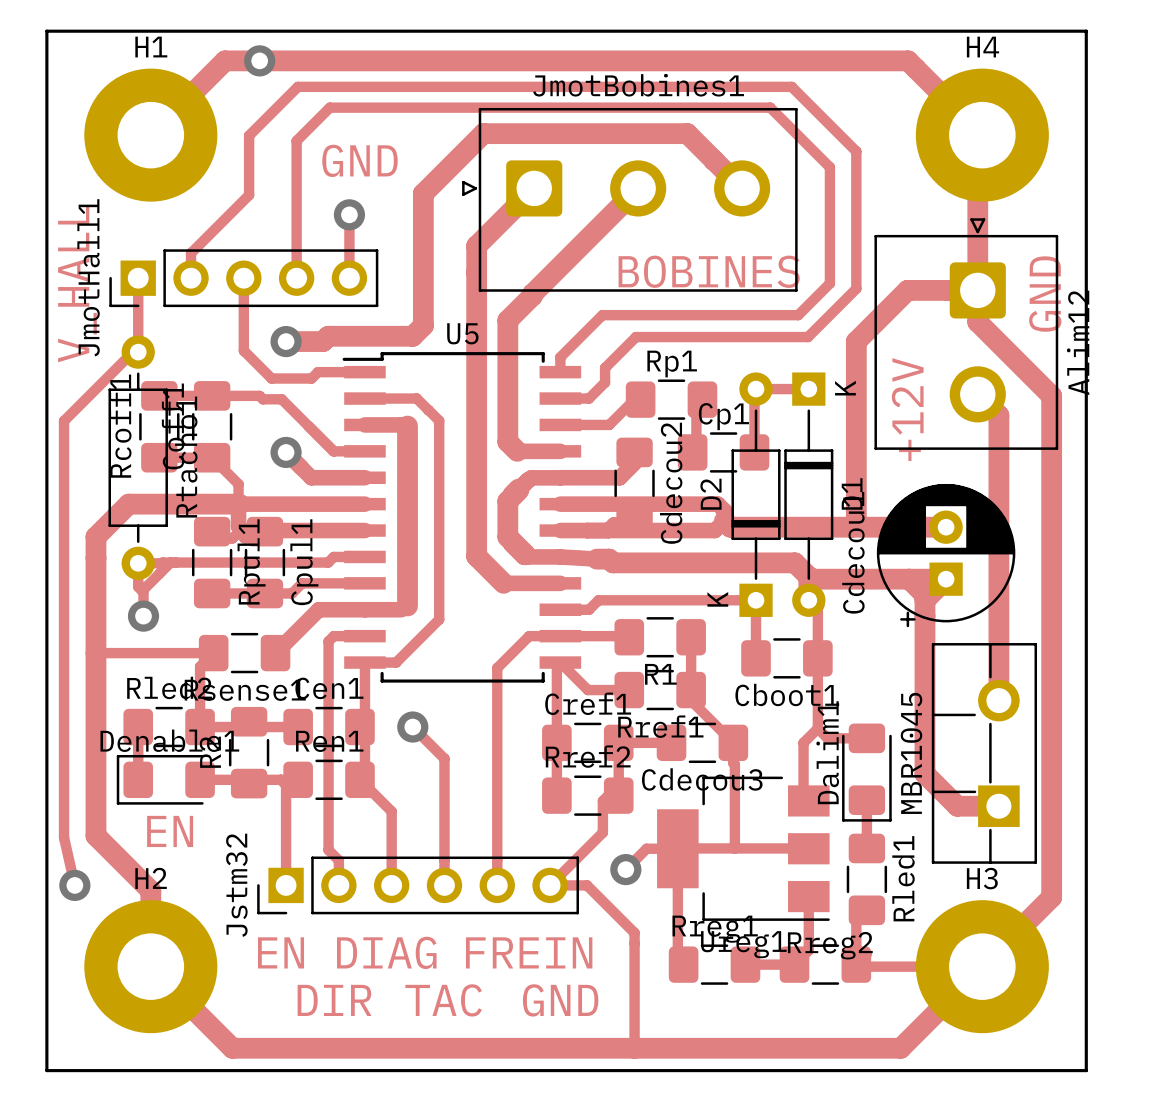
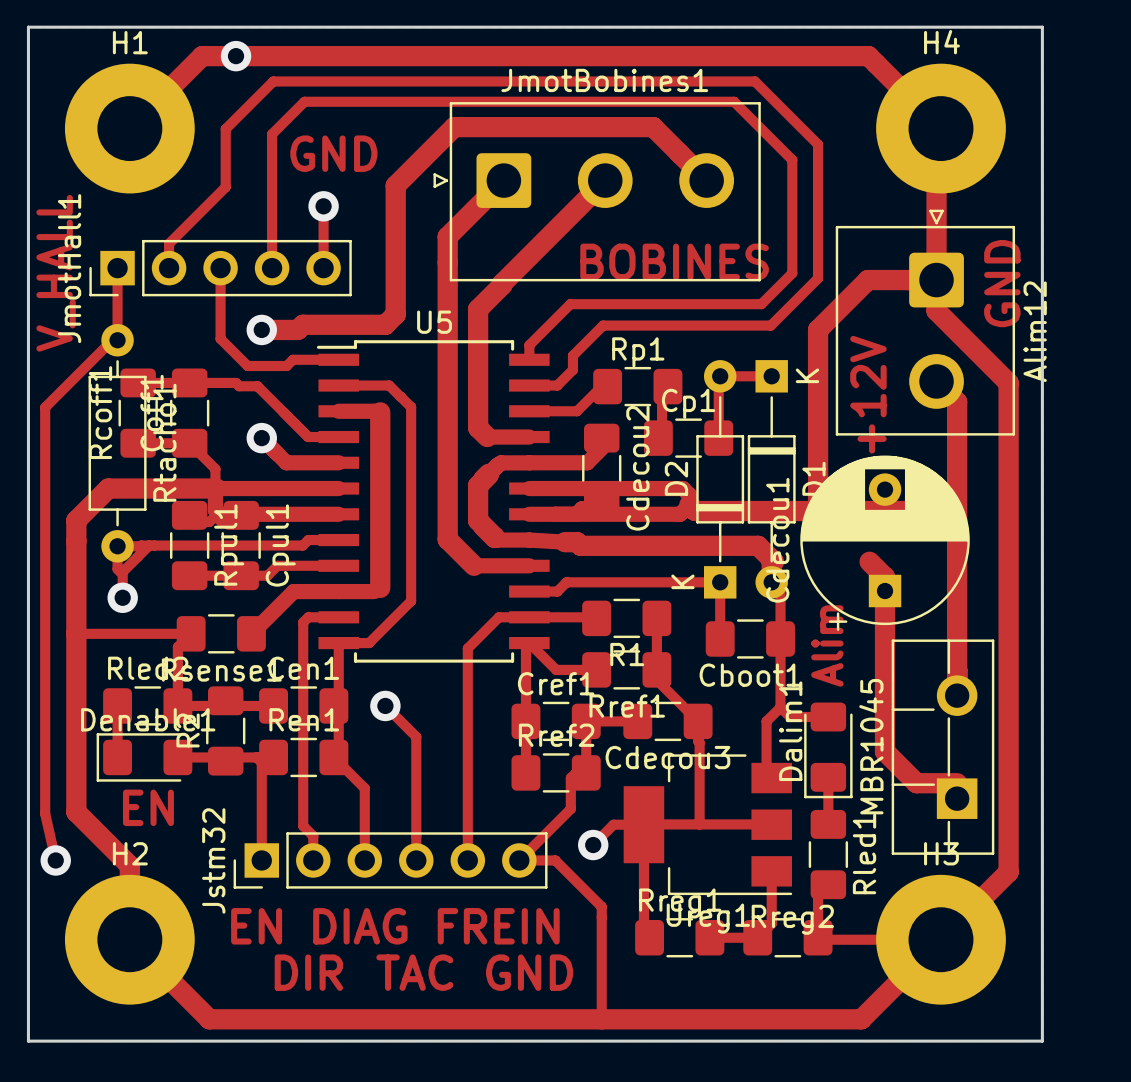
Cdecou1 footprint: [876, 483, 1016, 628] -> [800, 455, 970, 631]
track: (811, 579) (946, 579) (924, 600) -> none
text: none -> Alim (827, 646)
MBR1045 position: (984, 753) -> (942, 747)

